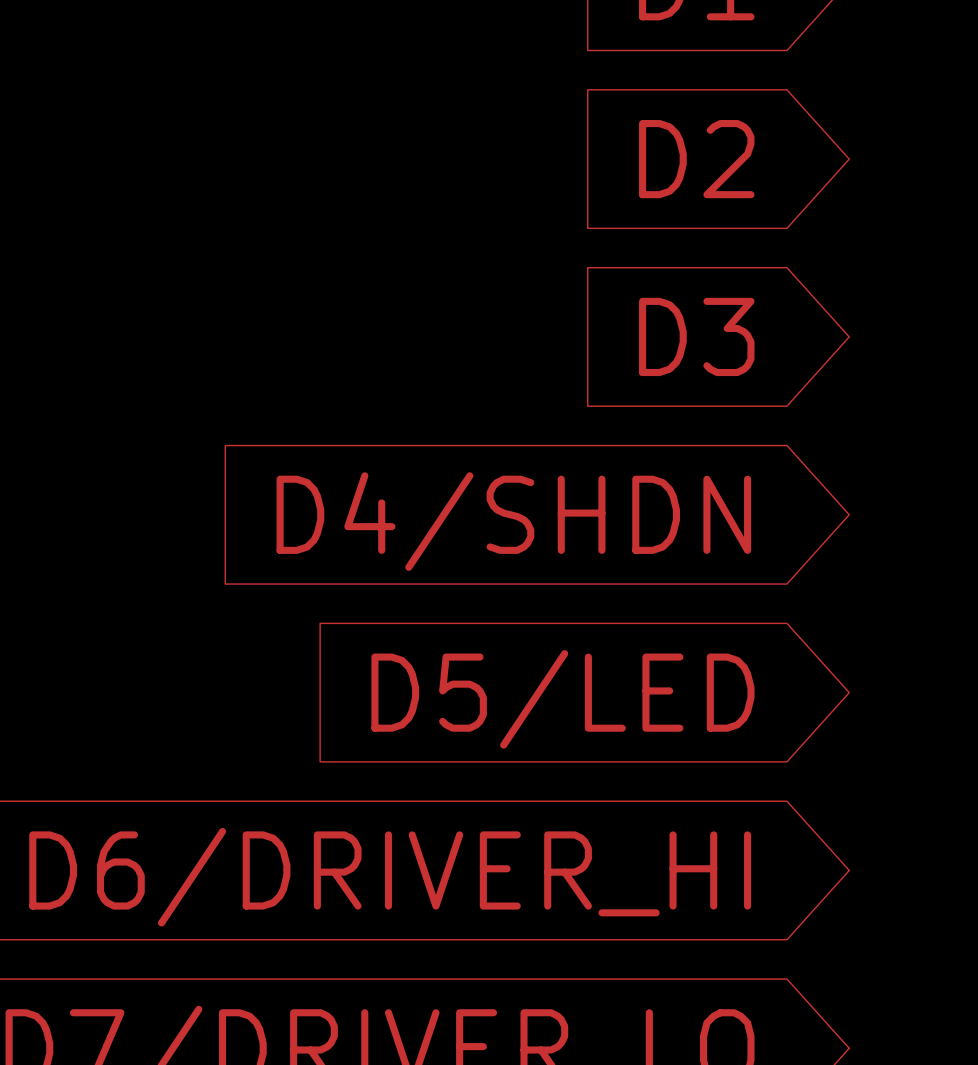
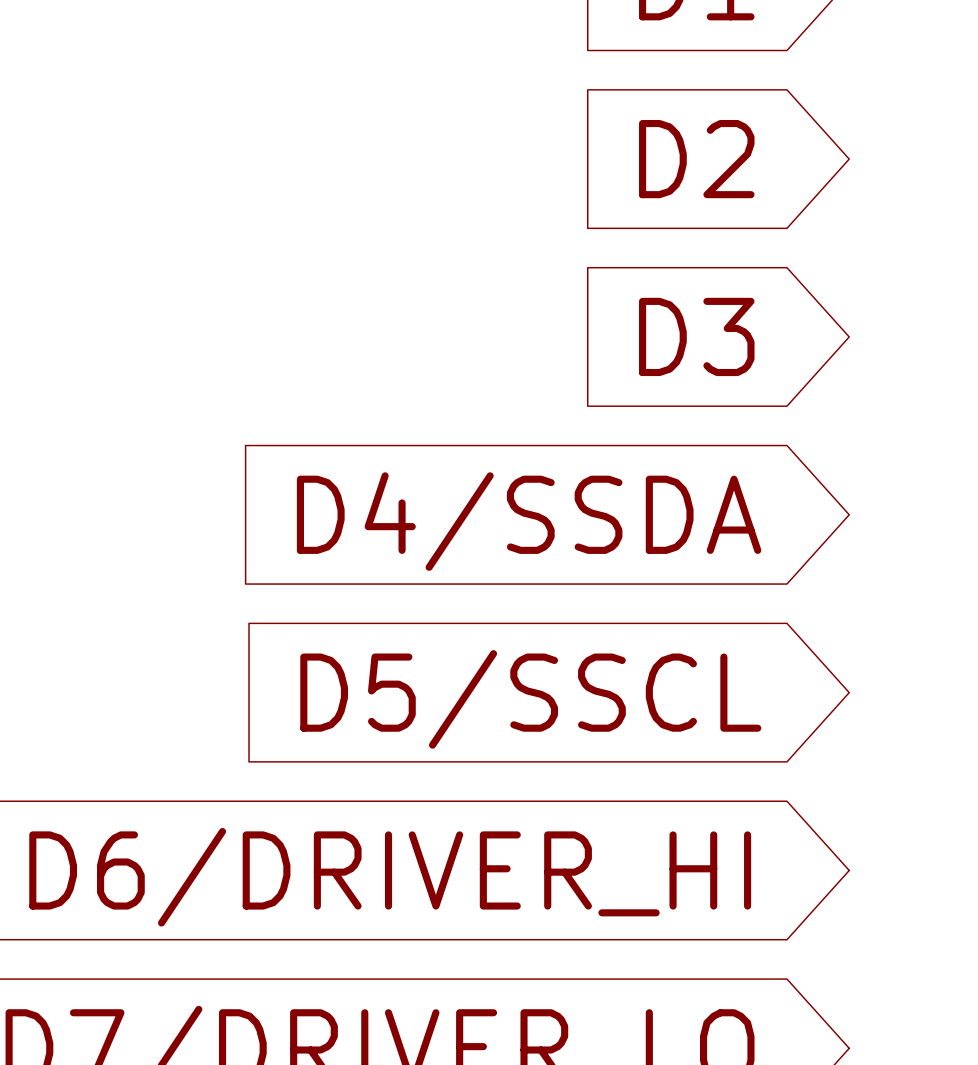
global label: D4/SHDN (513, 521) -> D4/SSDA (529, 521)
global label: D5/LED (562, 699) -> D5/SSCL (530, 699)

